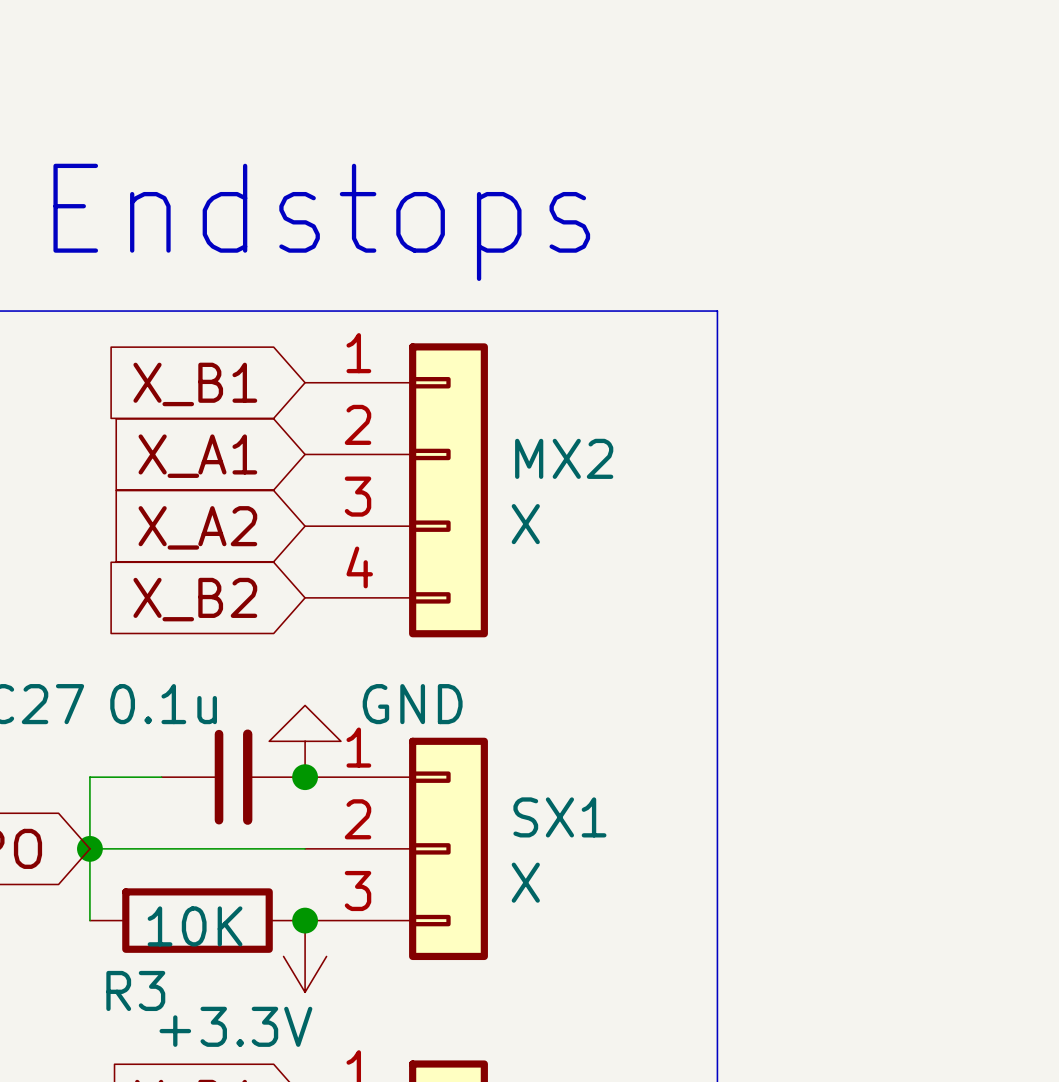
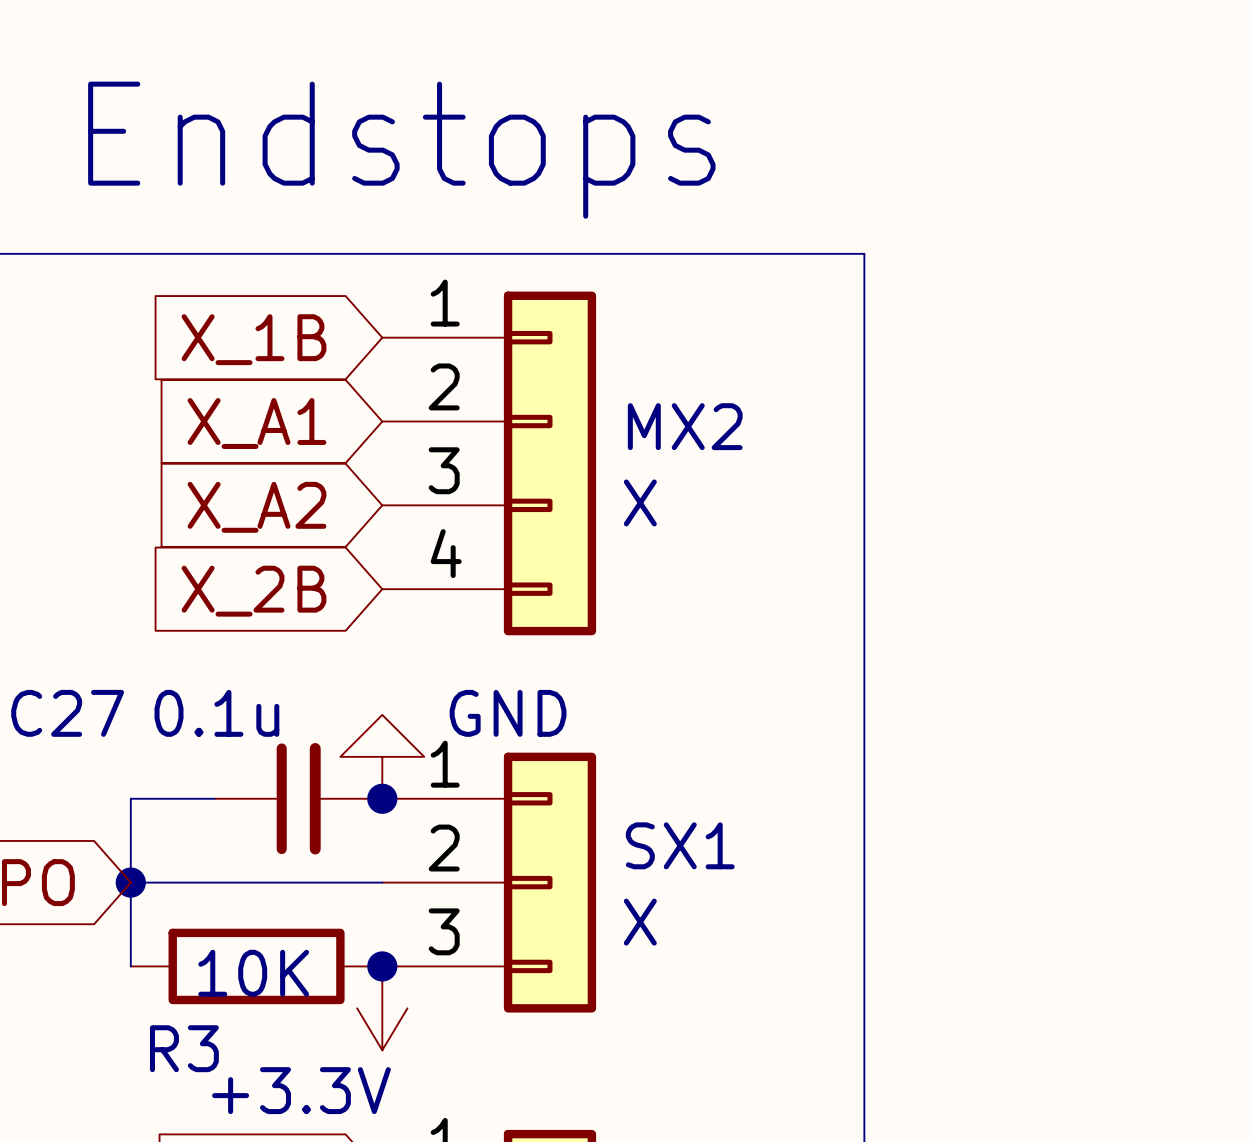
global label: X_B1 (195, 384) -> X_1B (254, 339)
global label: X_B2 (195, 599) -> X_2B (254, 591)

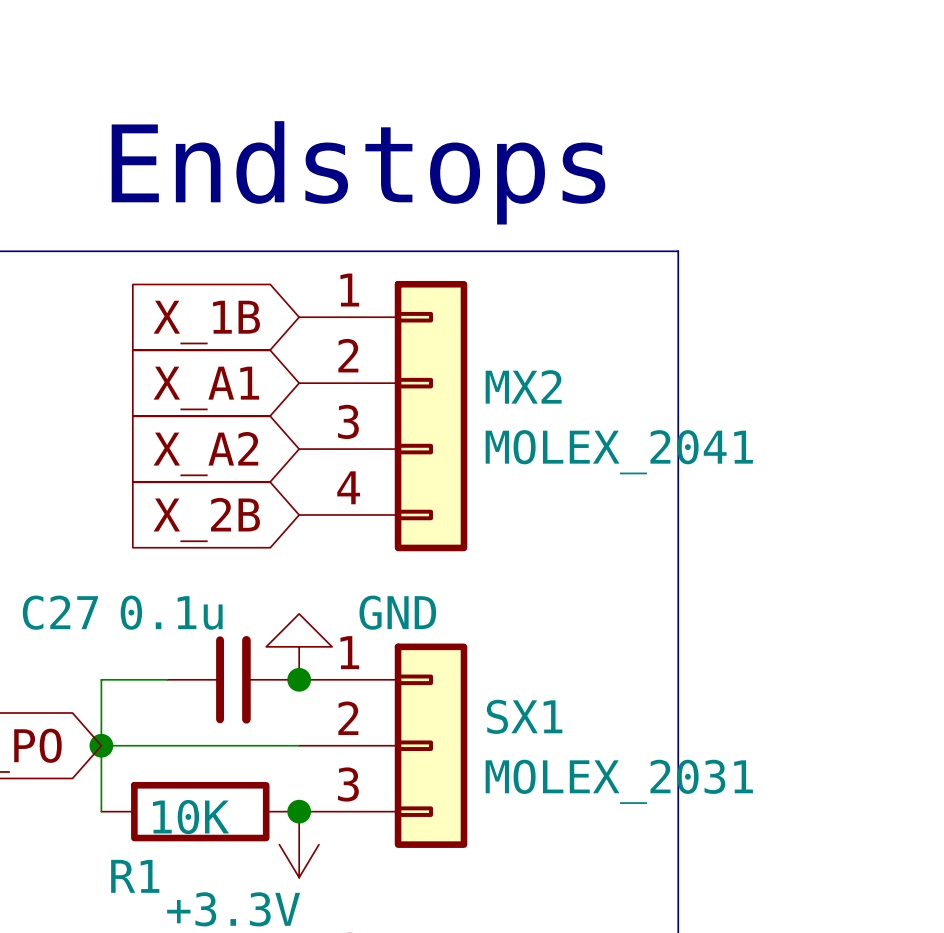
text position: Endstops (401, 150) -> Endstops (358, 172)
MX2 value: X (640, 502) -> MOLEX_2041 (619, 452)
SX1 value: X (640, 922) -> MOLEX_2031 (619, 781)
R3 name: R3 (184, 1048) -> R1 (135, 876)

